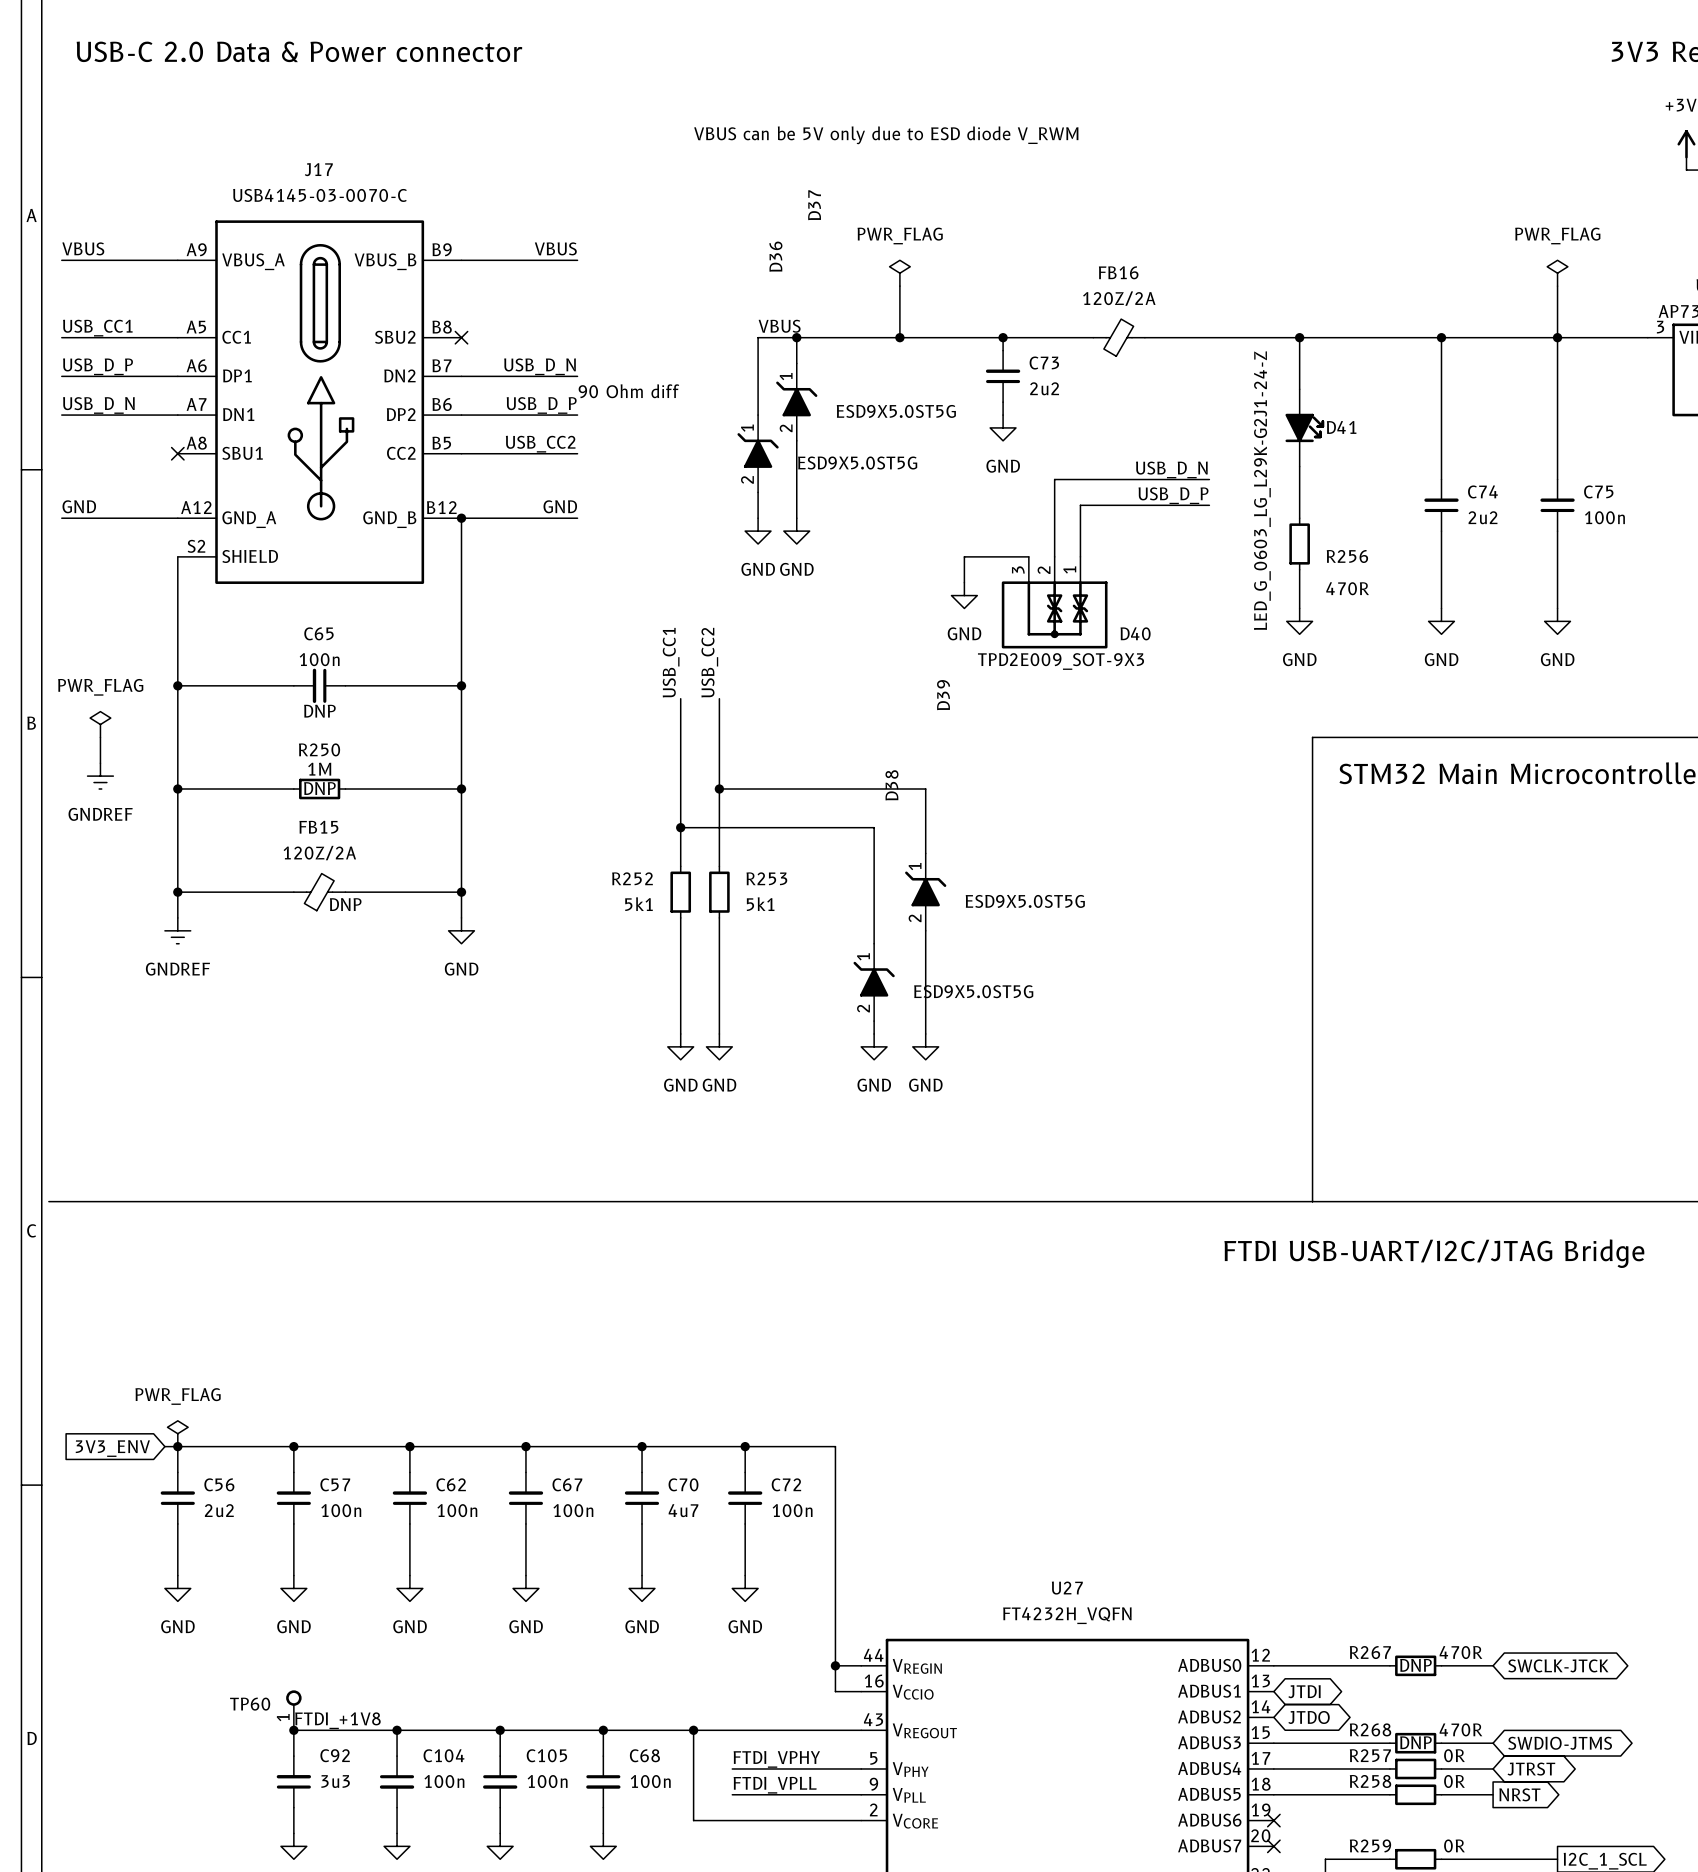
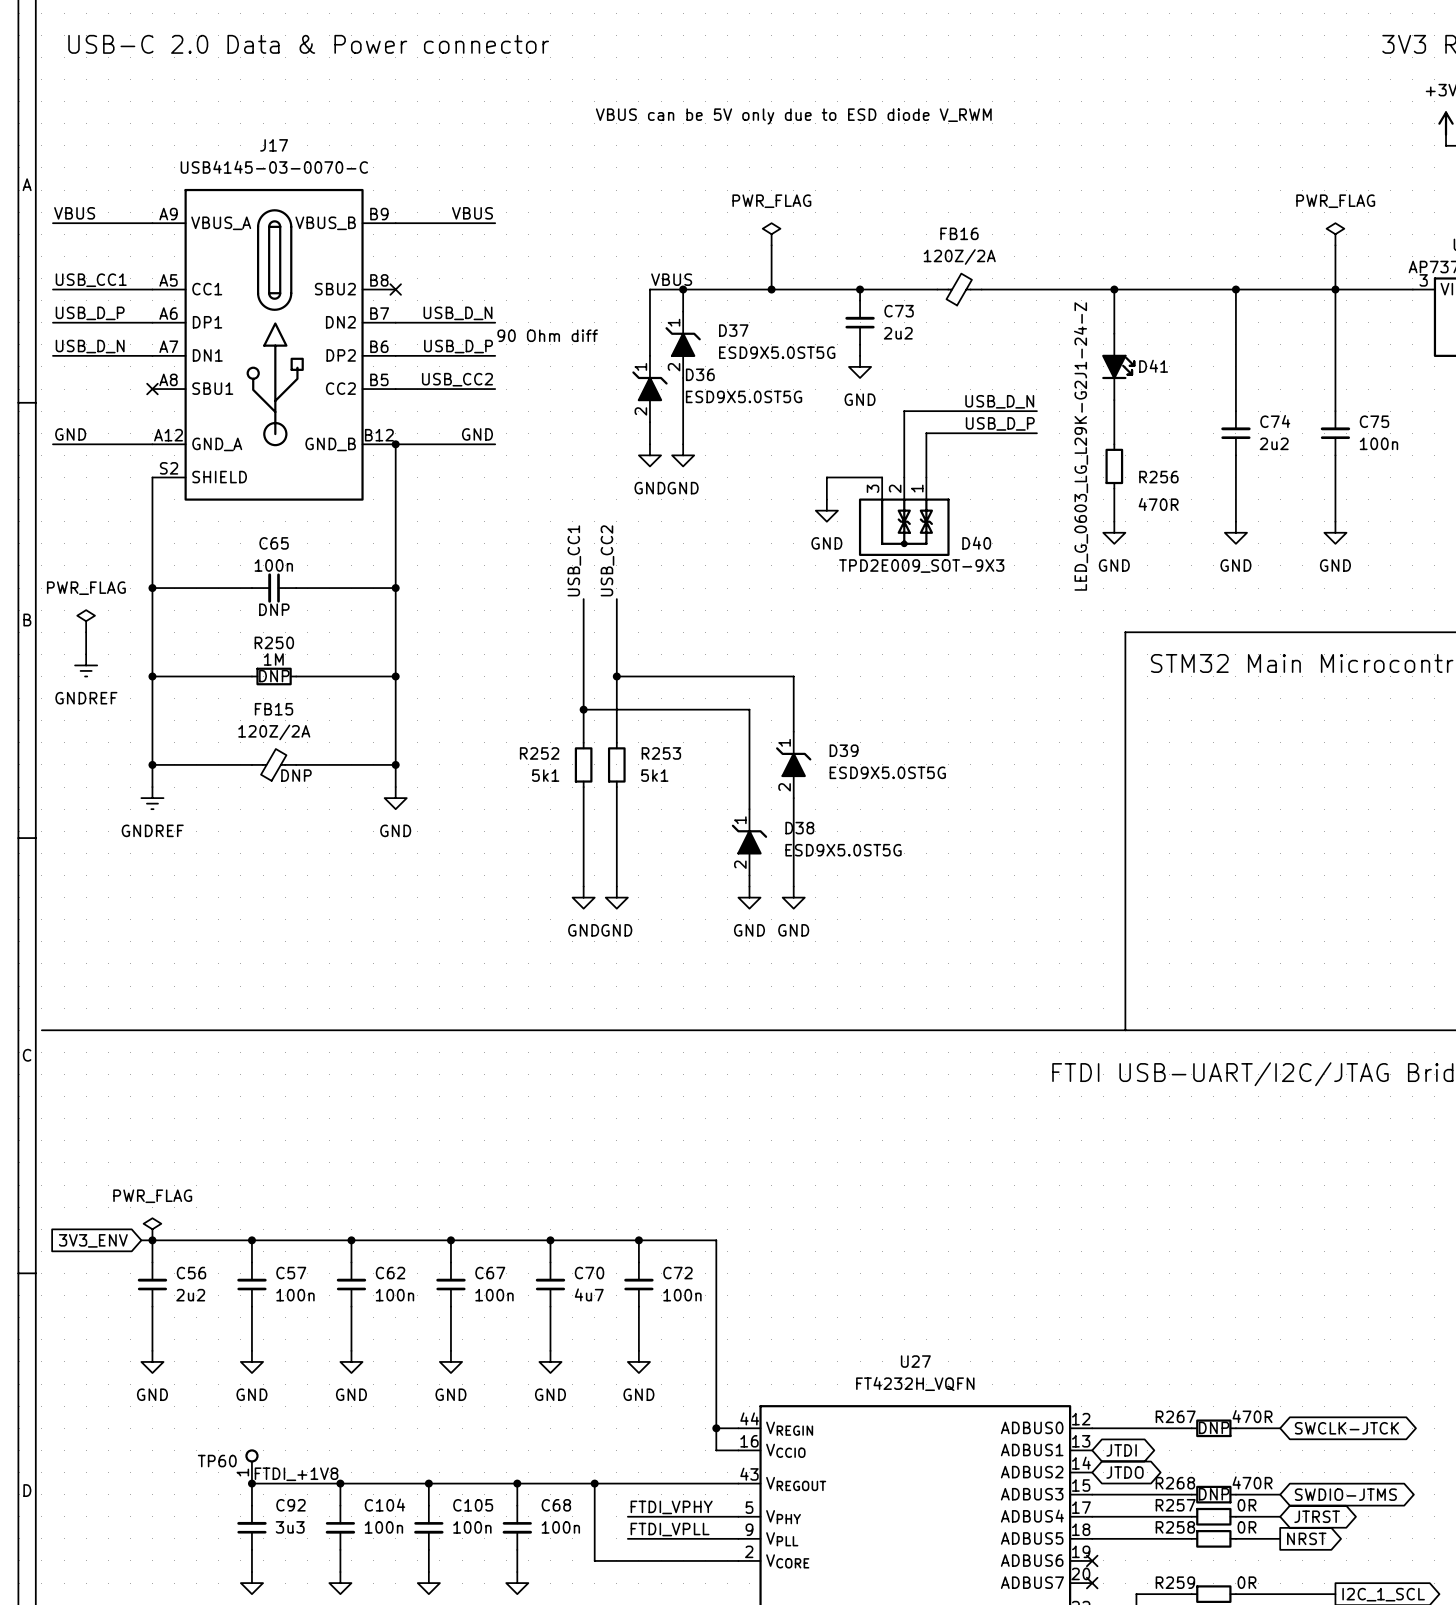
D37 name rotation: 0° (814, 205) -> 90° clockwise (733, 330)
D37 name position: D37 (814, 205) -> D37 (733, 330)
D36 name rotation: 0° (775, 256) -> 90° clockwise (700, 374)
D36 name position: D36 (775, 256) -> D36 (700, 374)
D39 name rotation: 0° (943, 695) -> 90° clockwise (844, 750)
D39 name position: D39 (943, 695) -> D39 (844, 750)
D38 name rotation: 0° (891, 785) -> 90° clockwise (799, 828)
D38 name position: D38 (891, 785) -> D38 (799, 828)

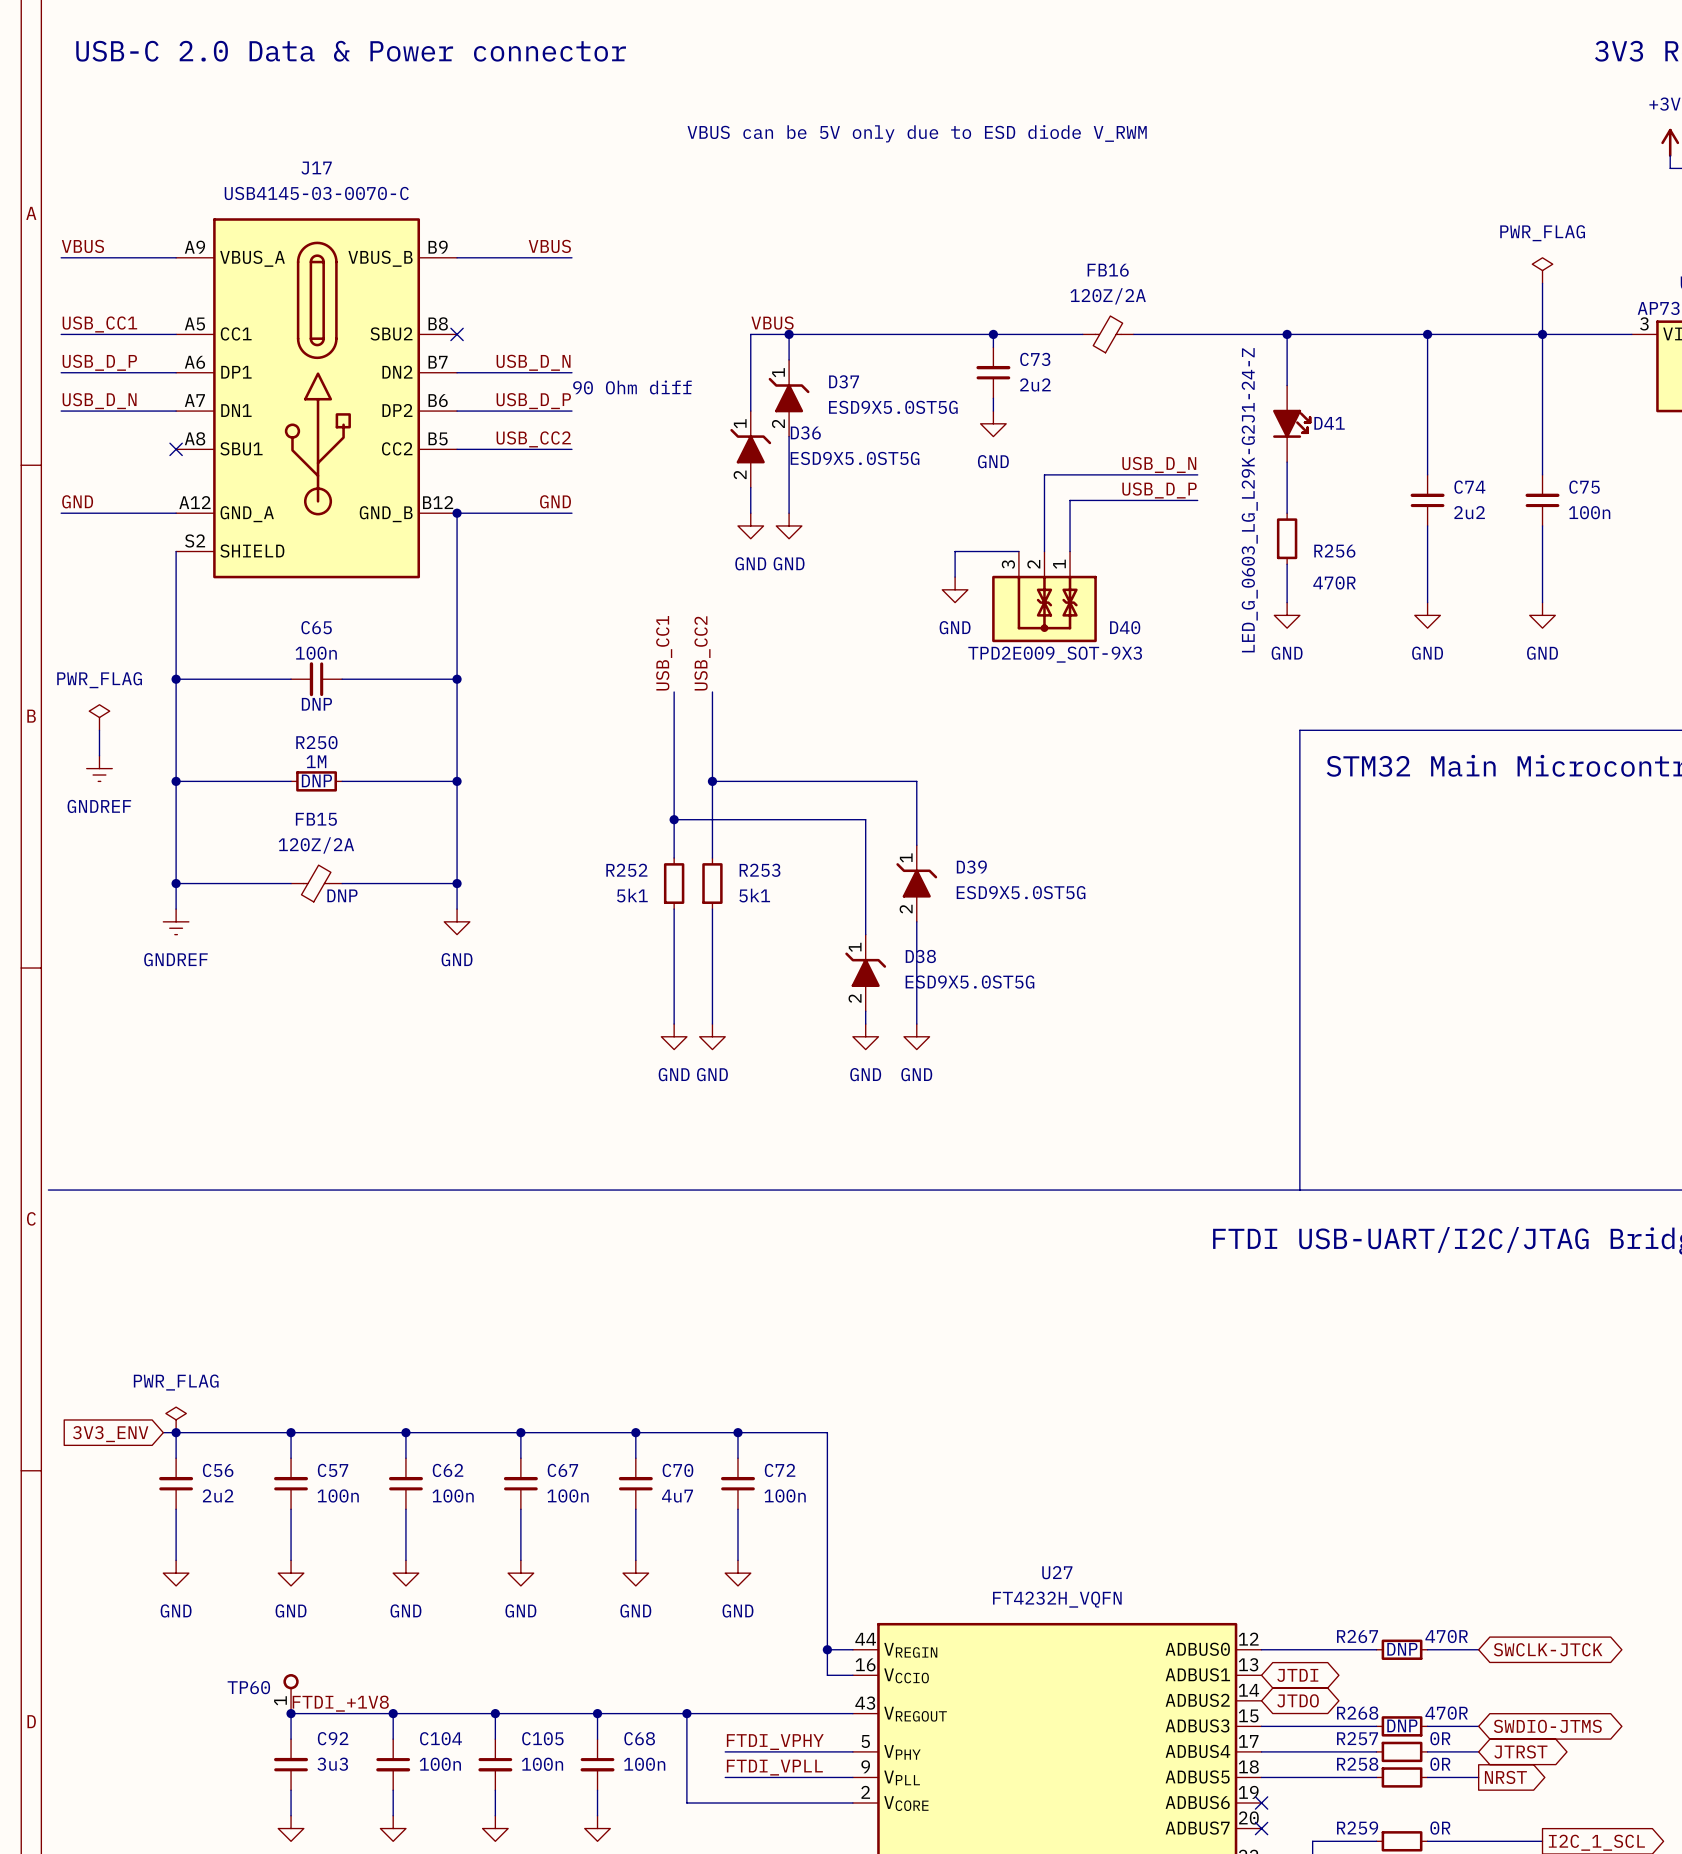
power symbol: PWR_FLAG (771, 234) -> none
wire: (771, 245) (771, 289) -> none
junction: (771, 289) -> none

